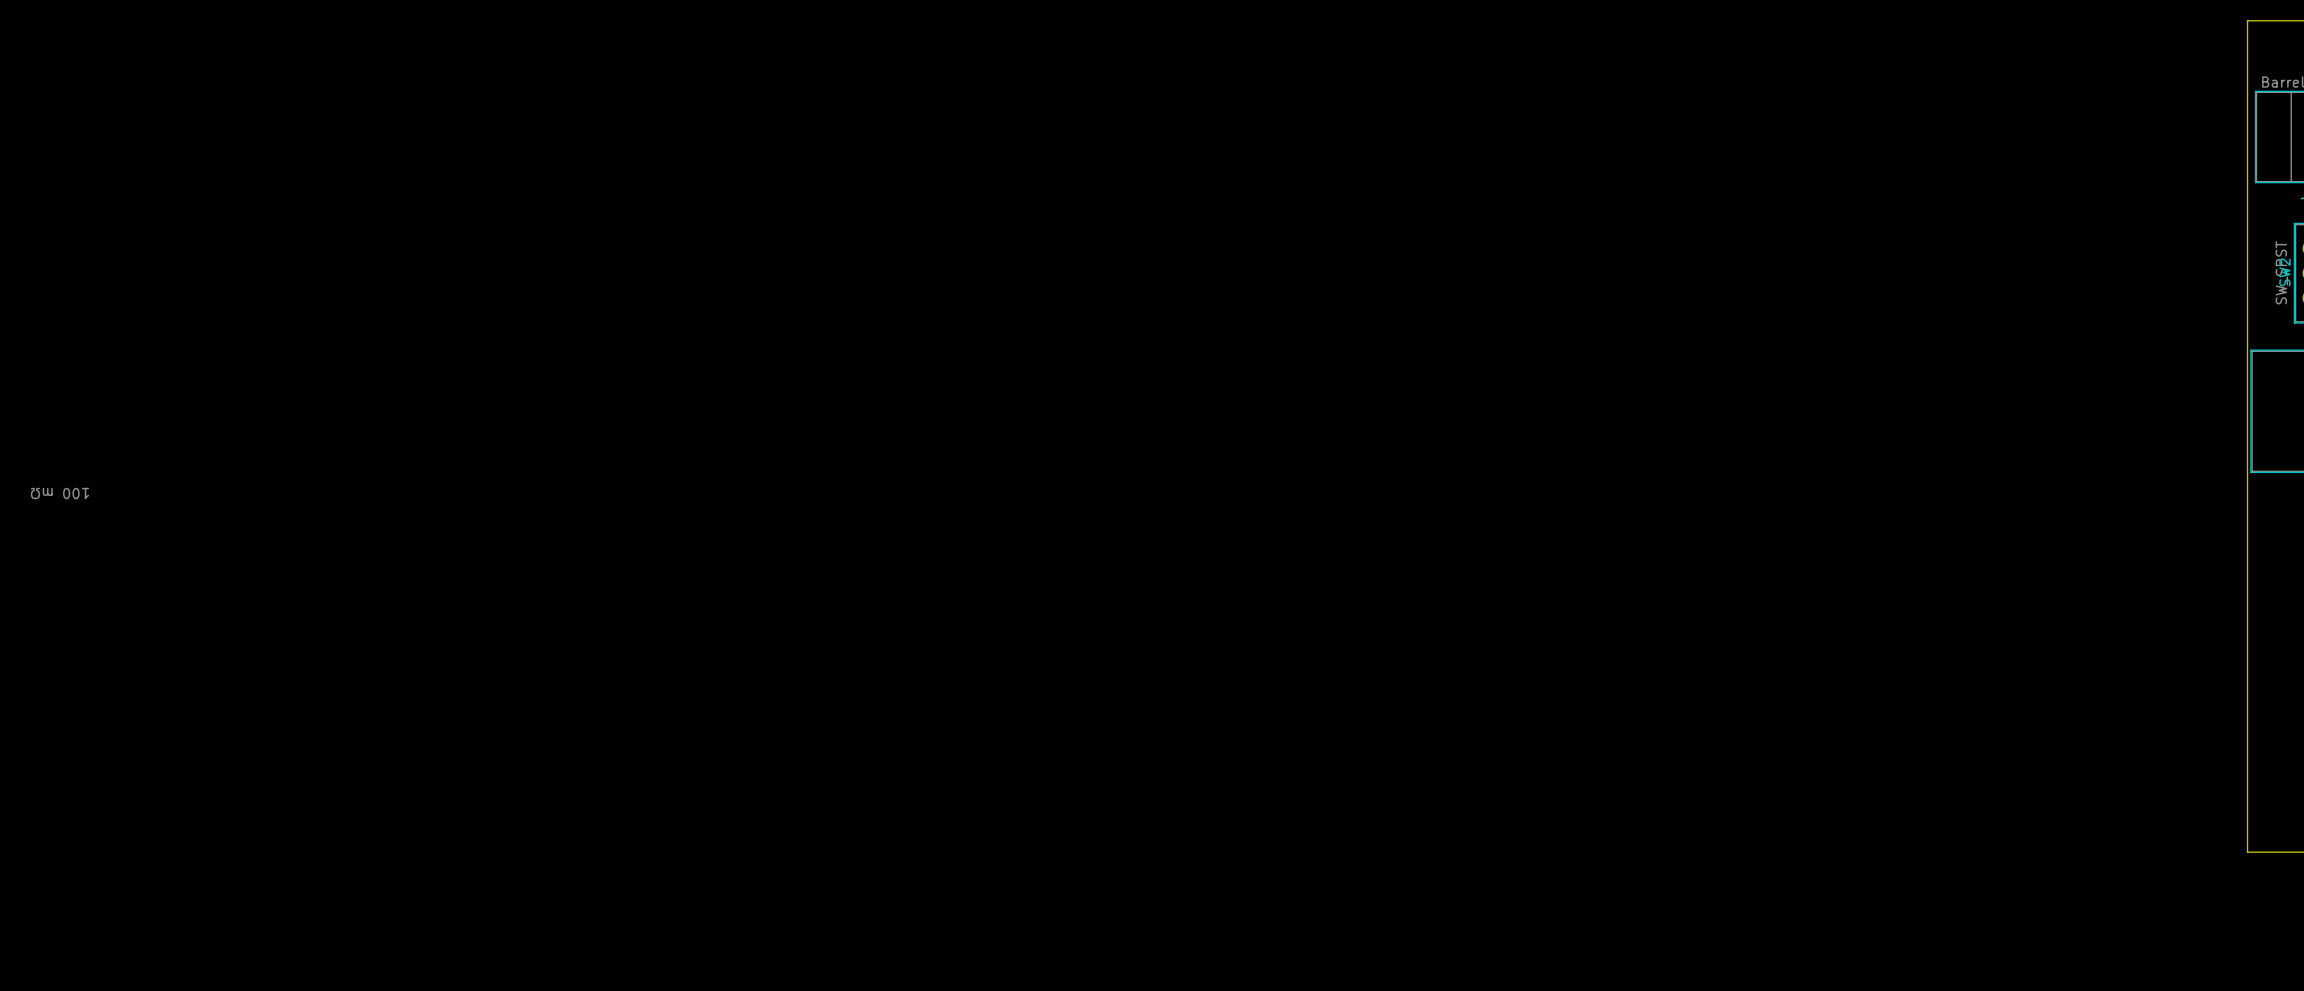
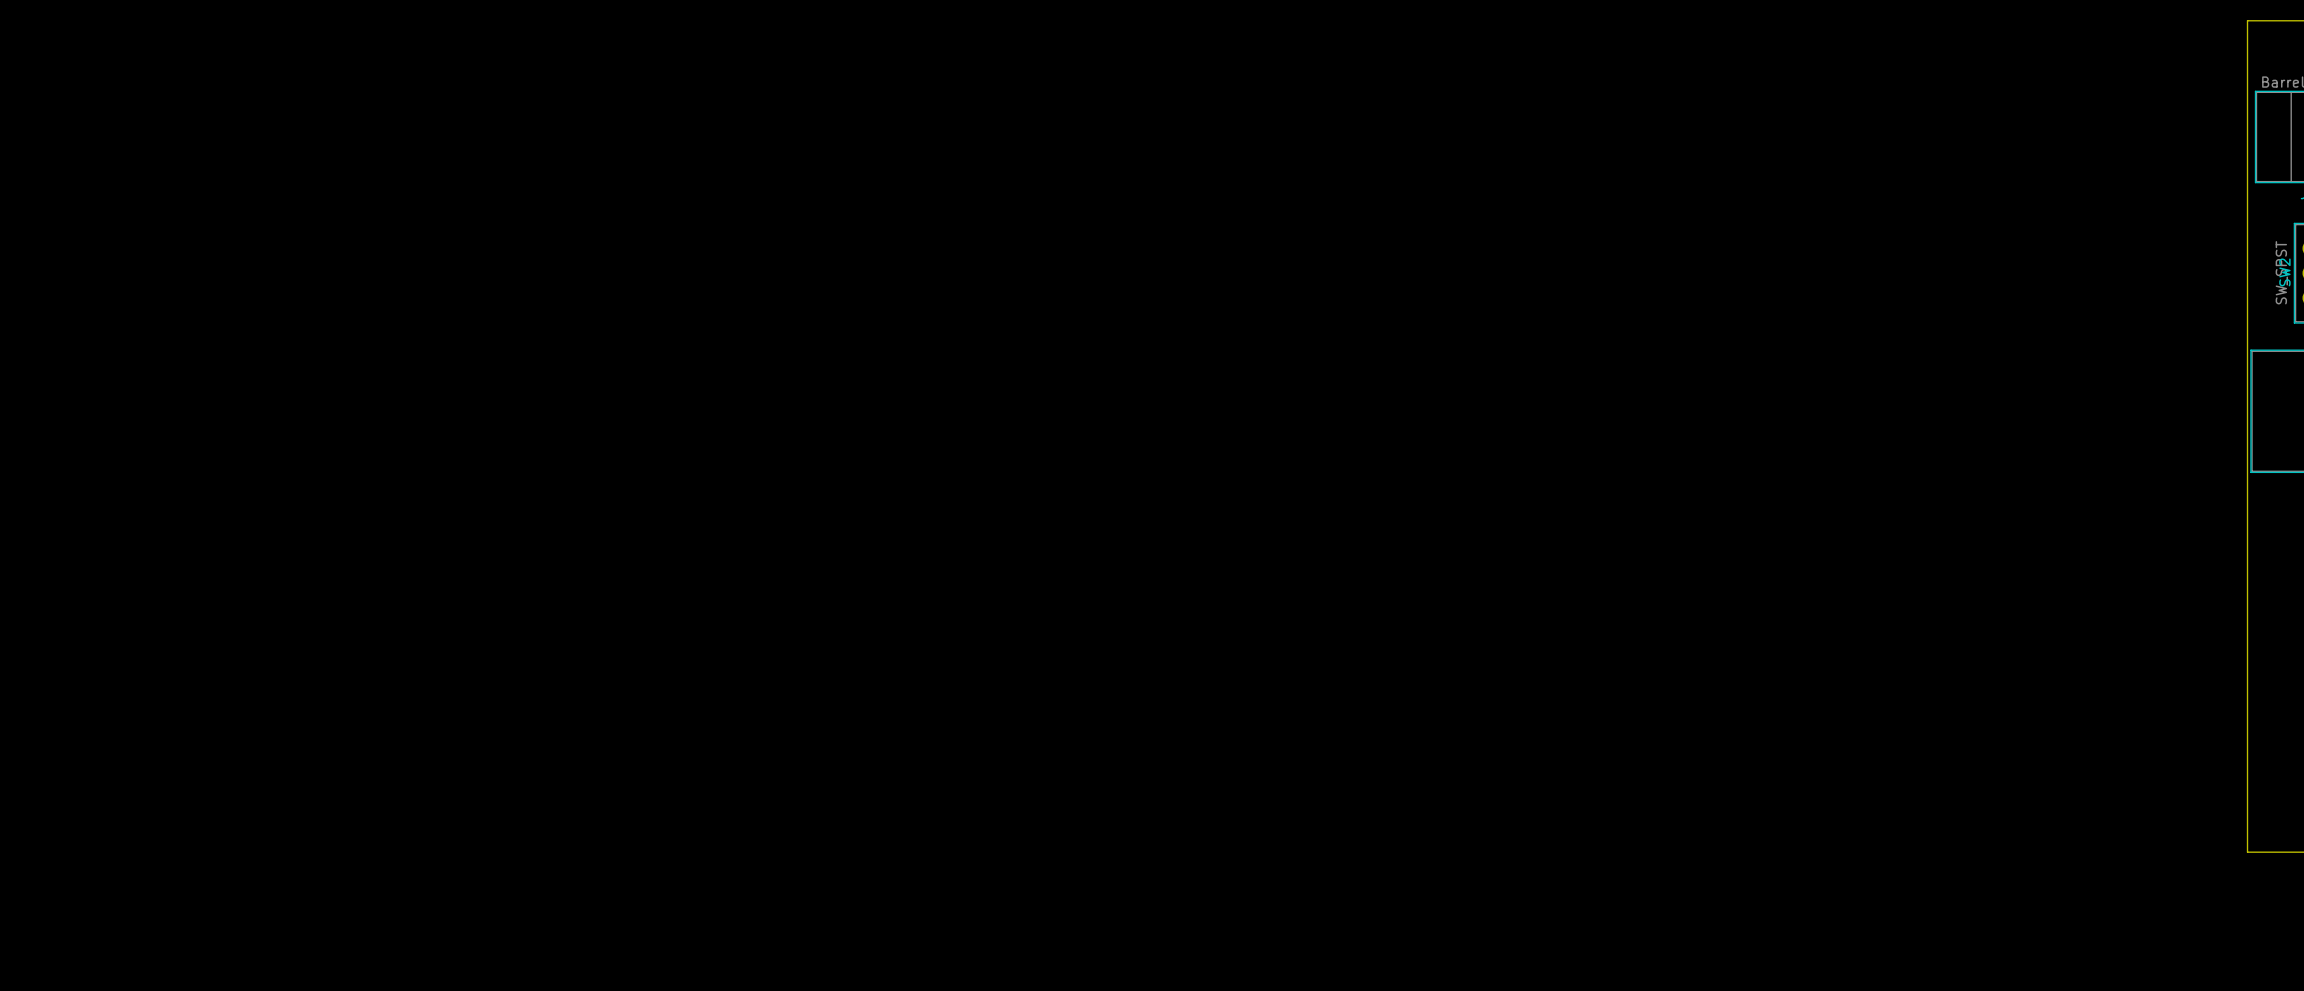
text: 100 mΩ (60, 493) -> none

